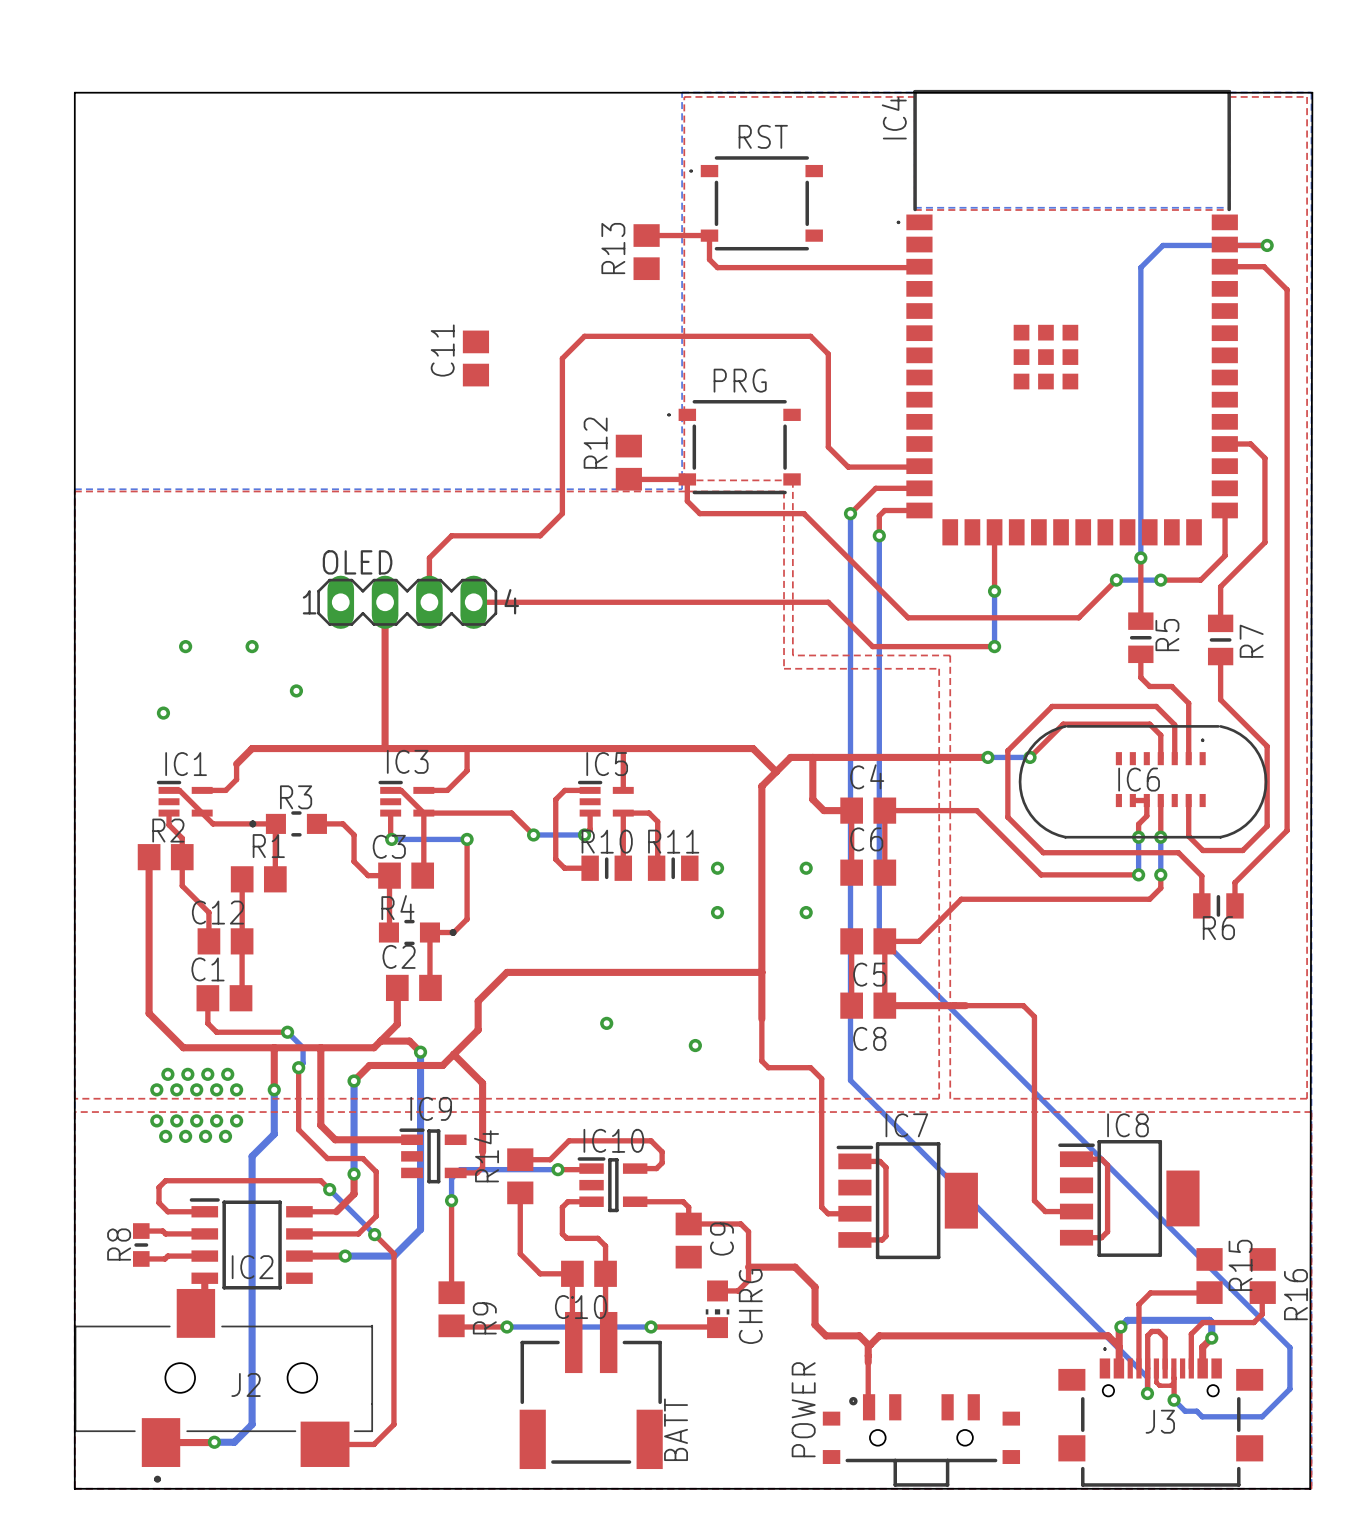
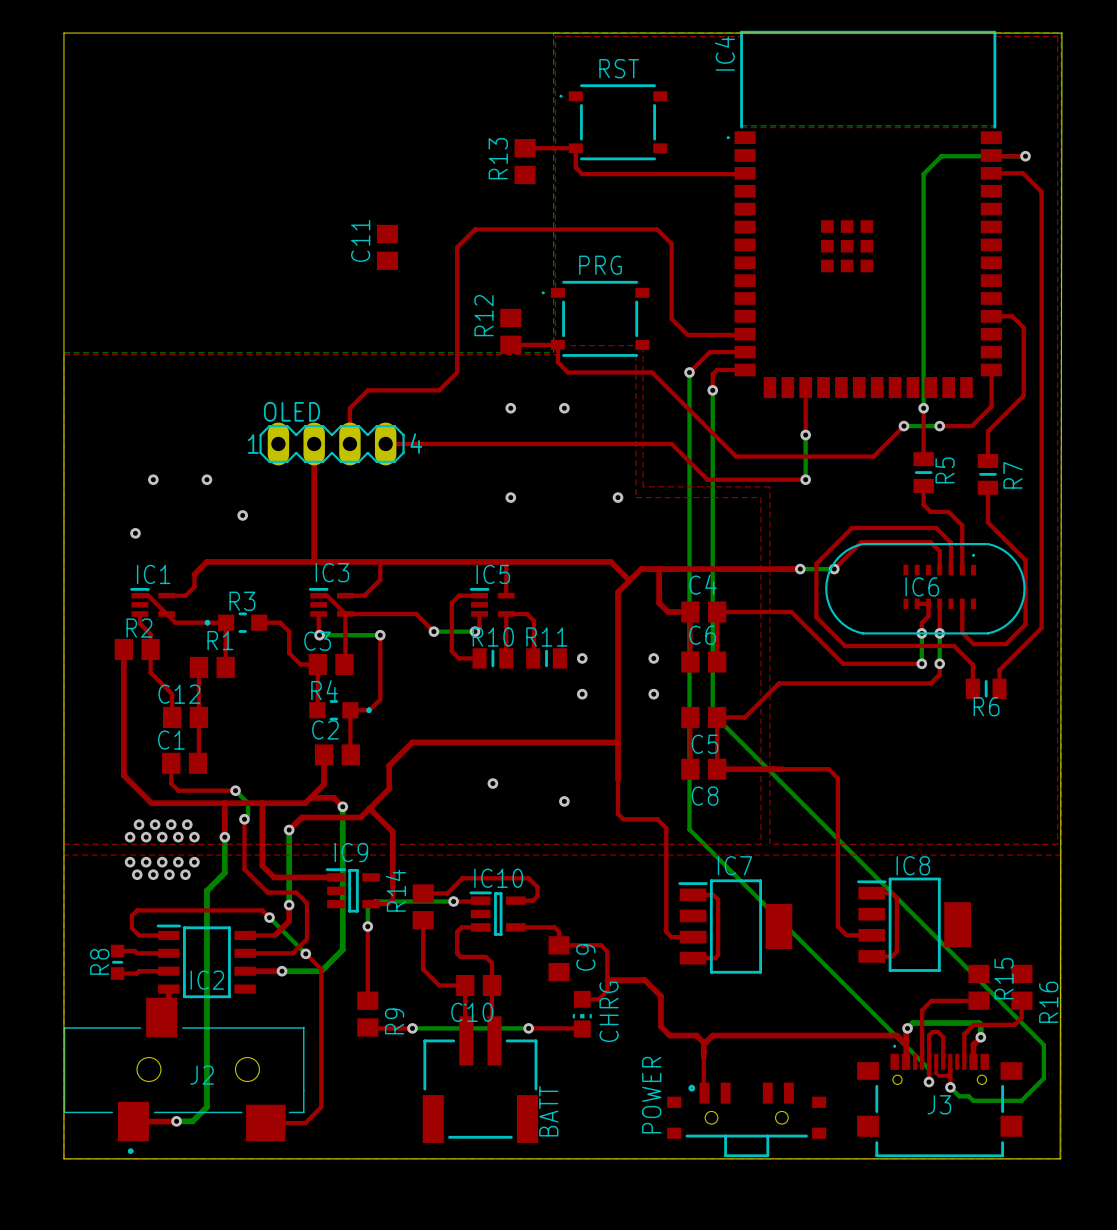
via: none -> (510, 408)
via: none -> (564, 408)
via: none -> (510, 497)
via: none -> (618, 497)

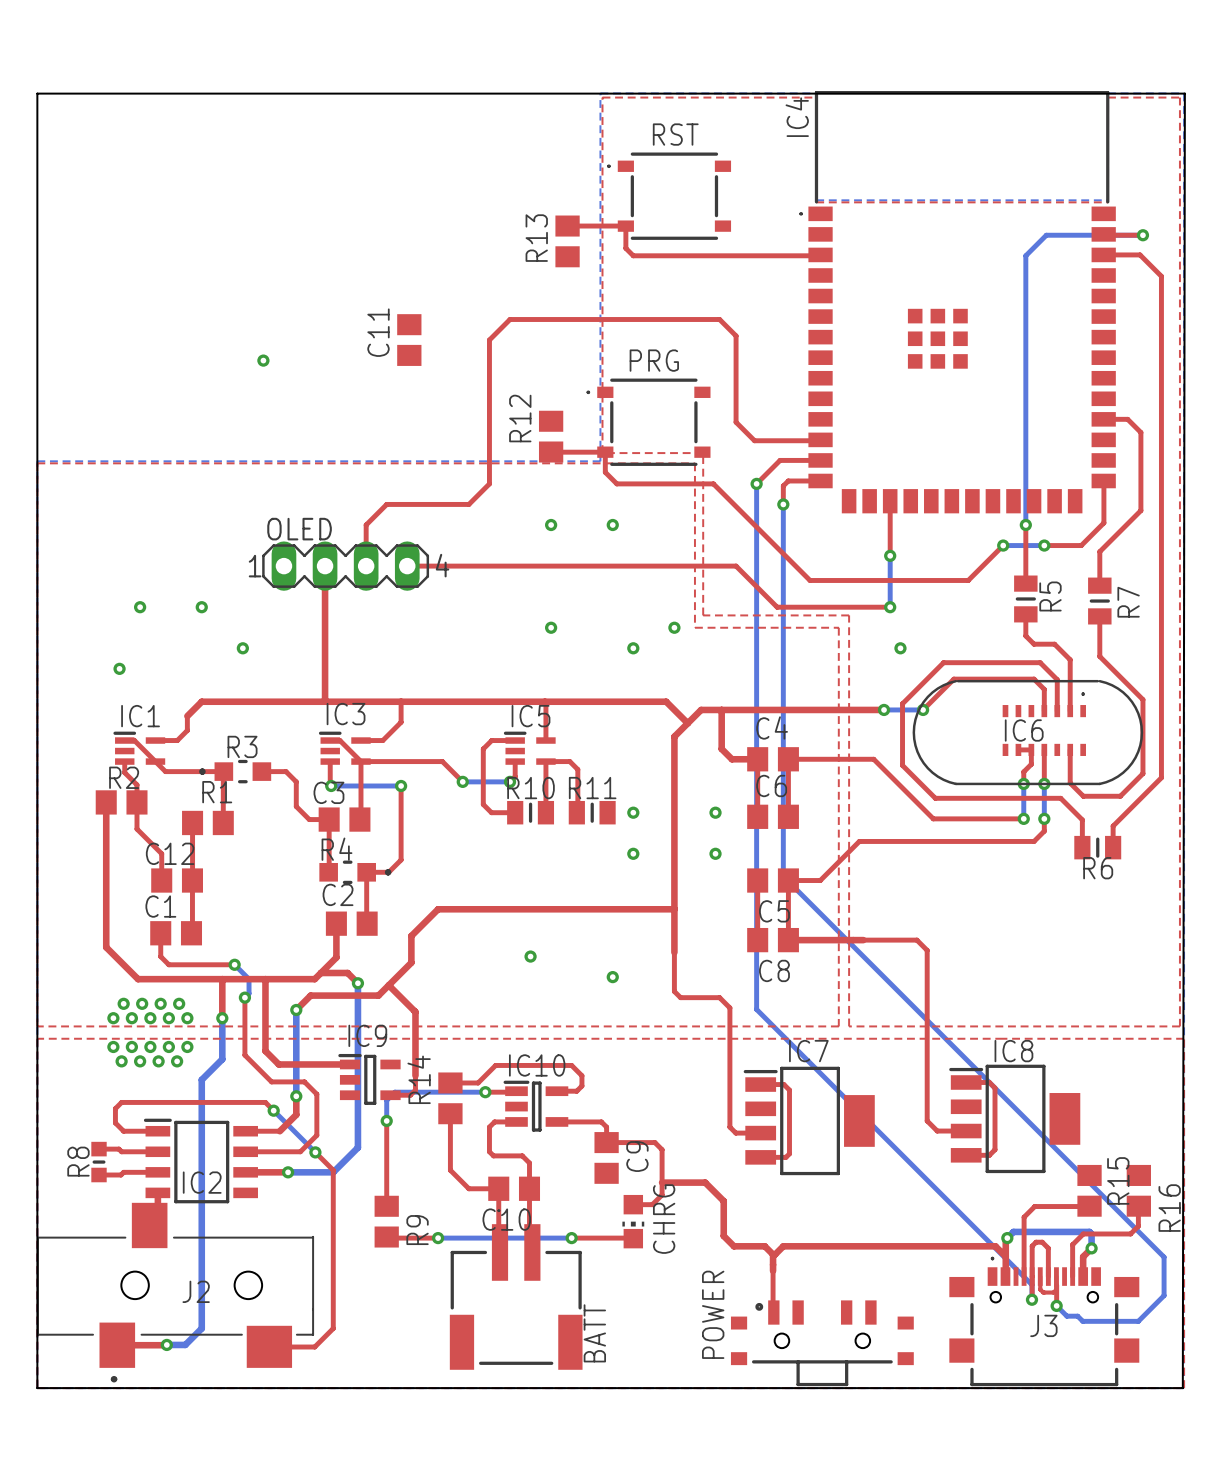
via: none -> (263, 360)
via: none -> (633, 648)
via: none -> (900, 648)

